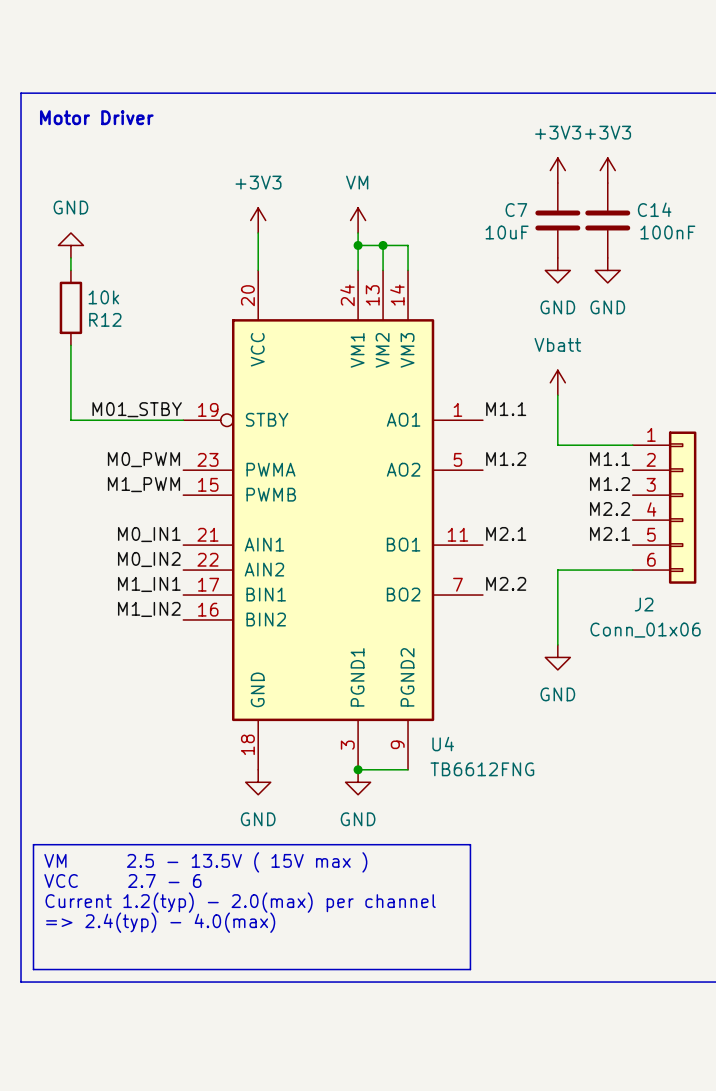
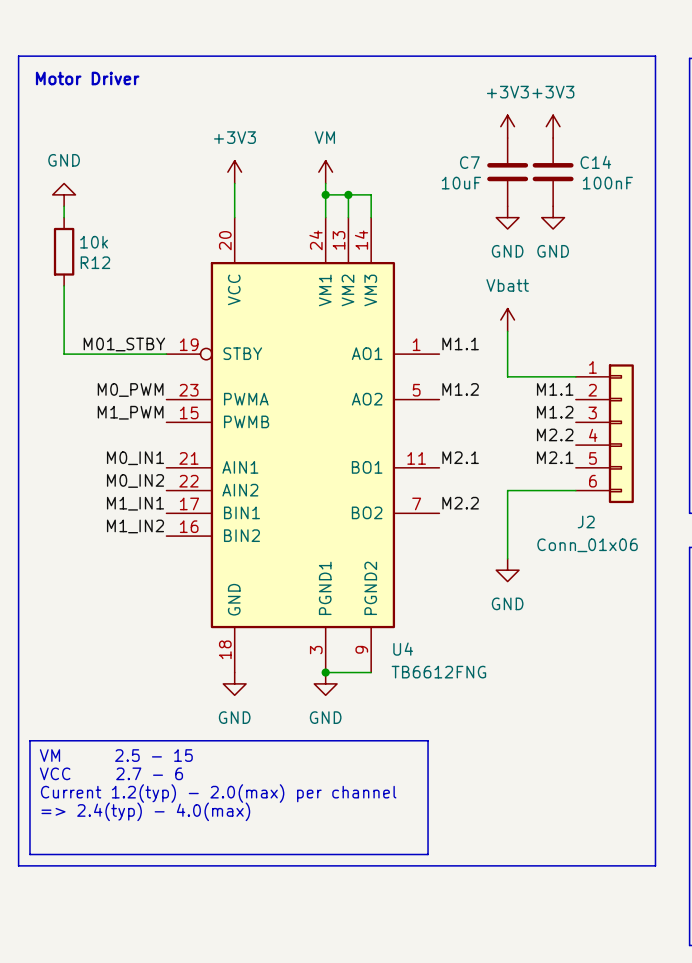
text: VM 2.5 - 13.5V ( 15V max ) (205, 862) -> VM 2.5 - 15 (116, 755)

